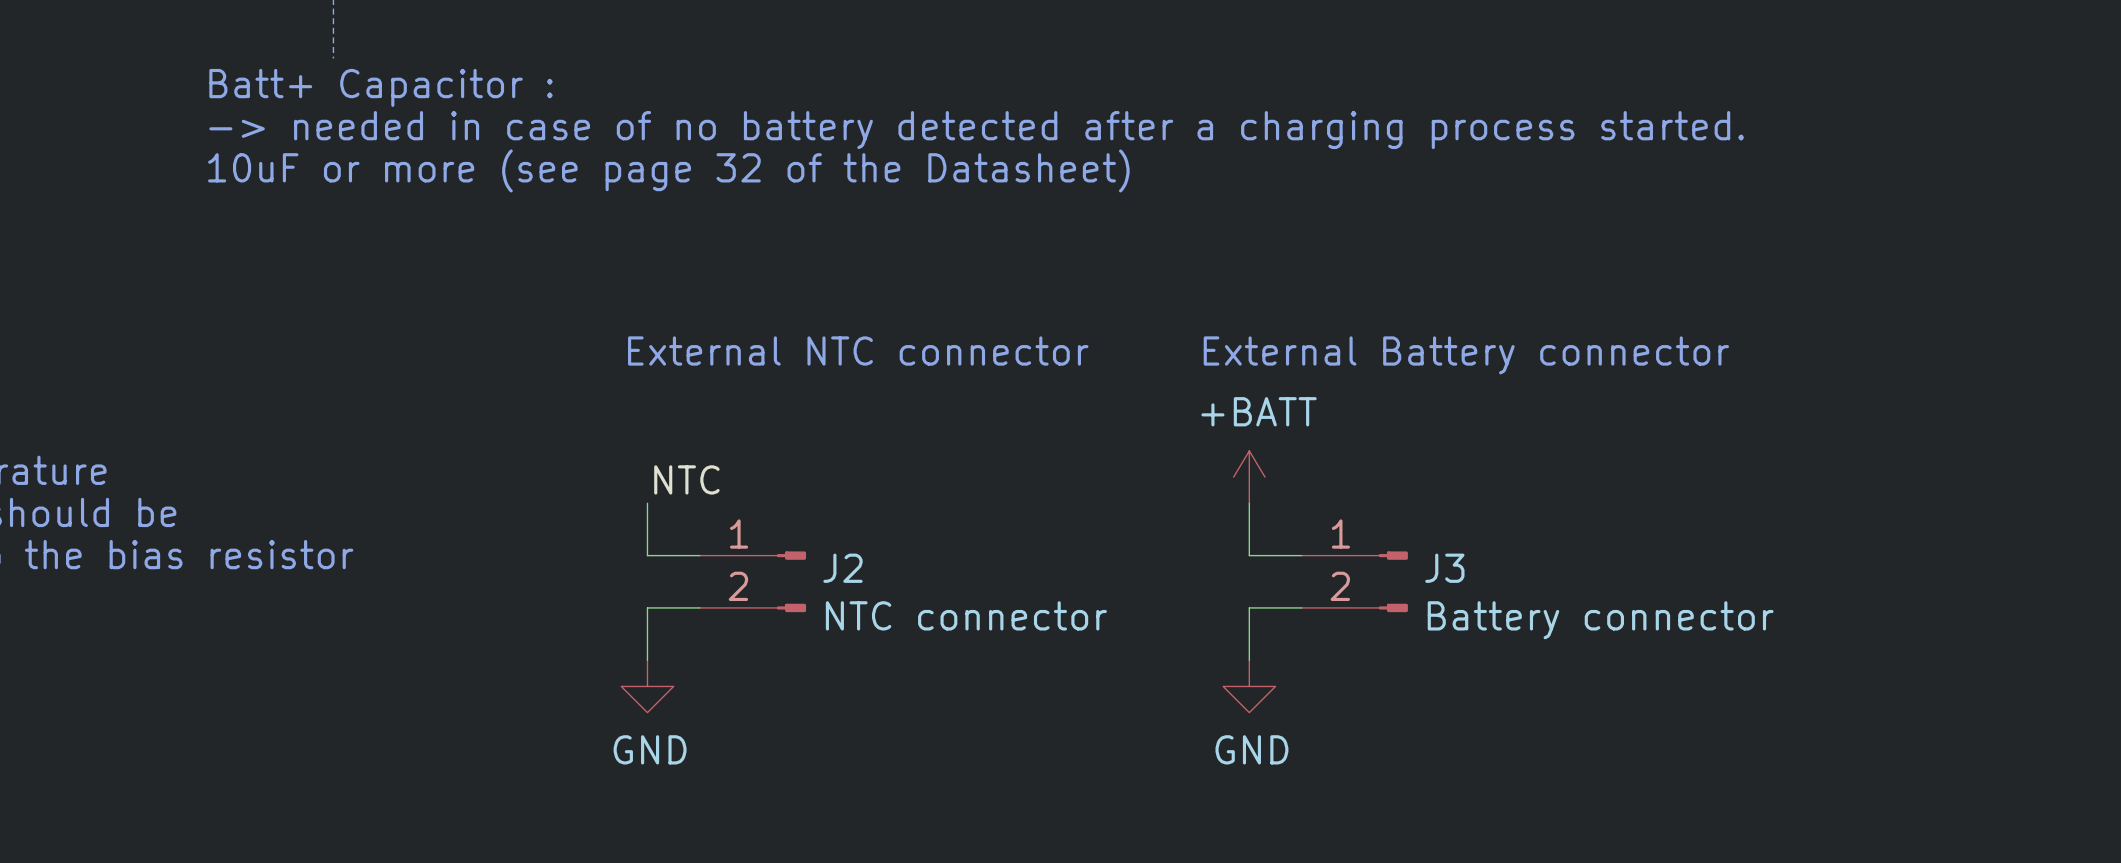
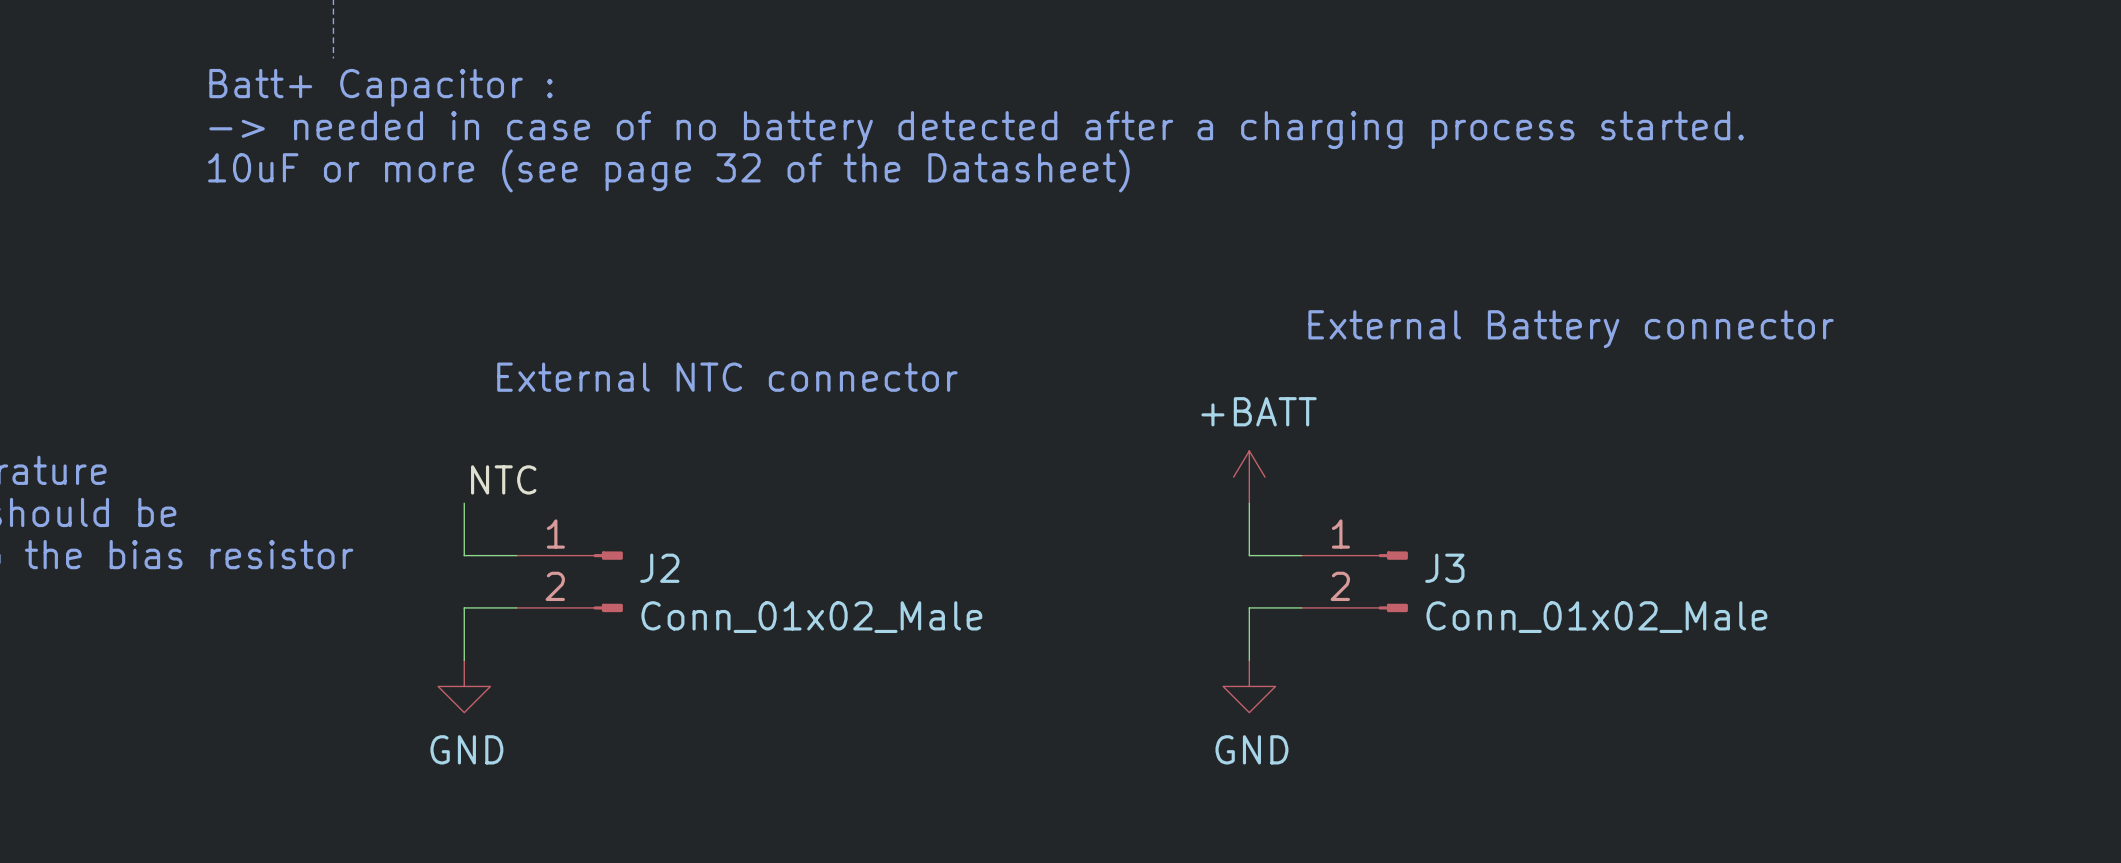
text position: External NTC connector (858, 350) -> External NTC connector (727, 377)
text position: External Battery connector (1466, 355) -> External Battery connector (1571, 329)
label position: NTC (686, 479) -> NTC (503, 479)
wire: (647, 503) (647, 555) (699, 555) -> (464, 503) (464, 555) (516, 555)
J2 position: (752, 581) -> (569, 581)
wire: (699, 607) (647, 607) (647, 660) -> (516, 607) (464, 607) (464, 660)
J2 value: NTC connector (966, 615) -> Conn_01x02_Male (811, 617)
J3 value: Battery connector (1600, 620) -> Conn_01x02_Male (1596, 617)
power symbol position: GND (647, 686) -> GND (464, 686)

